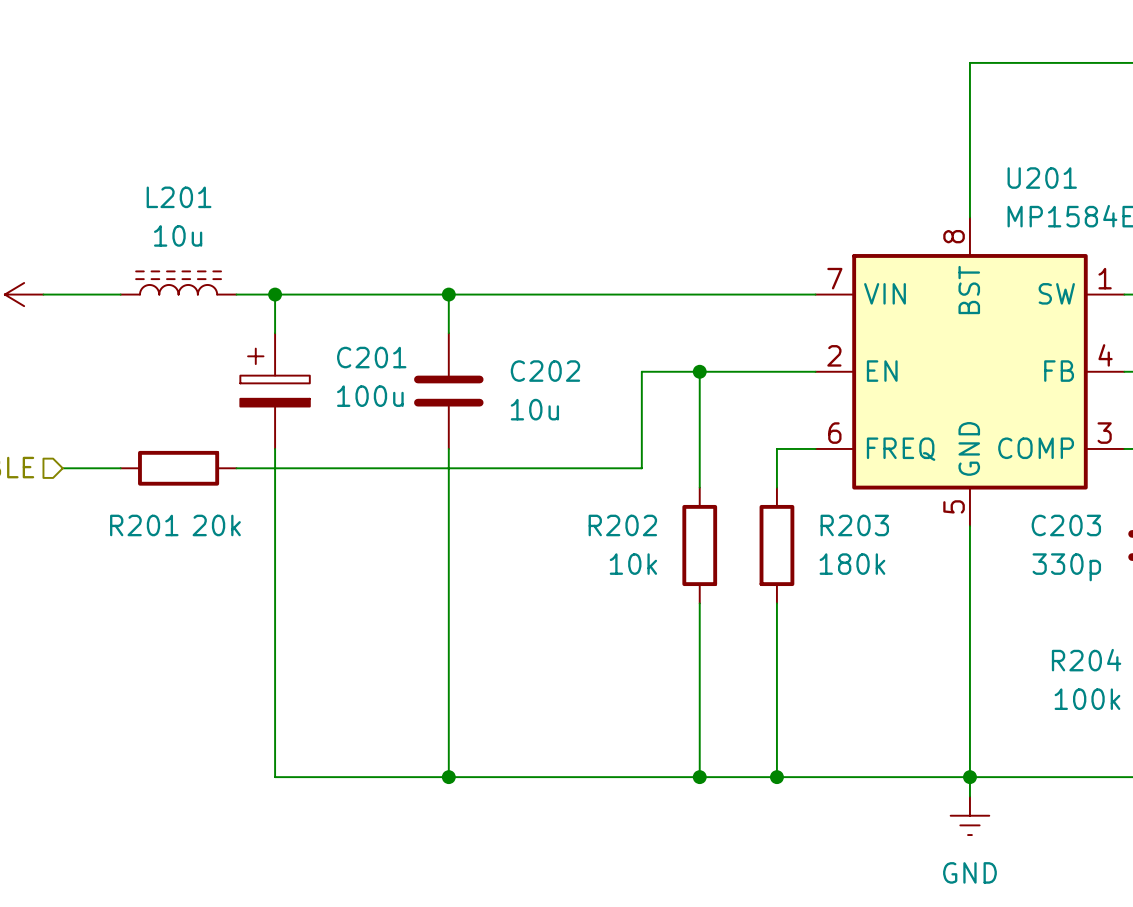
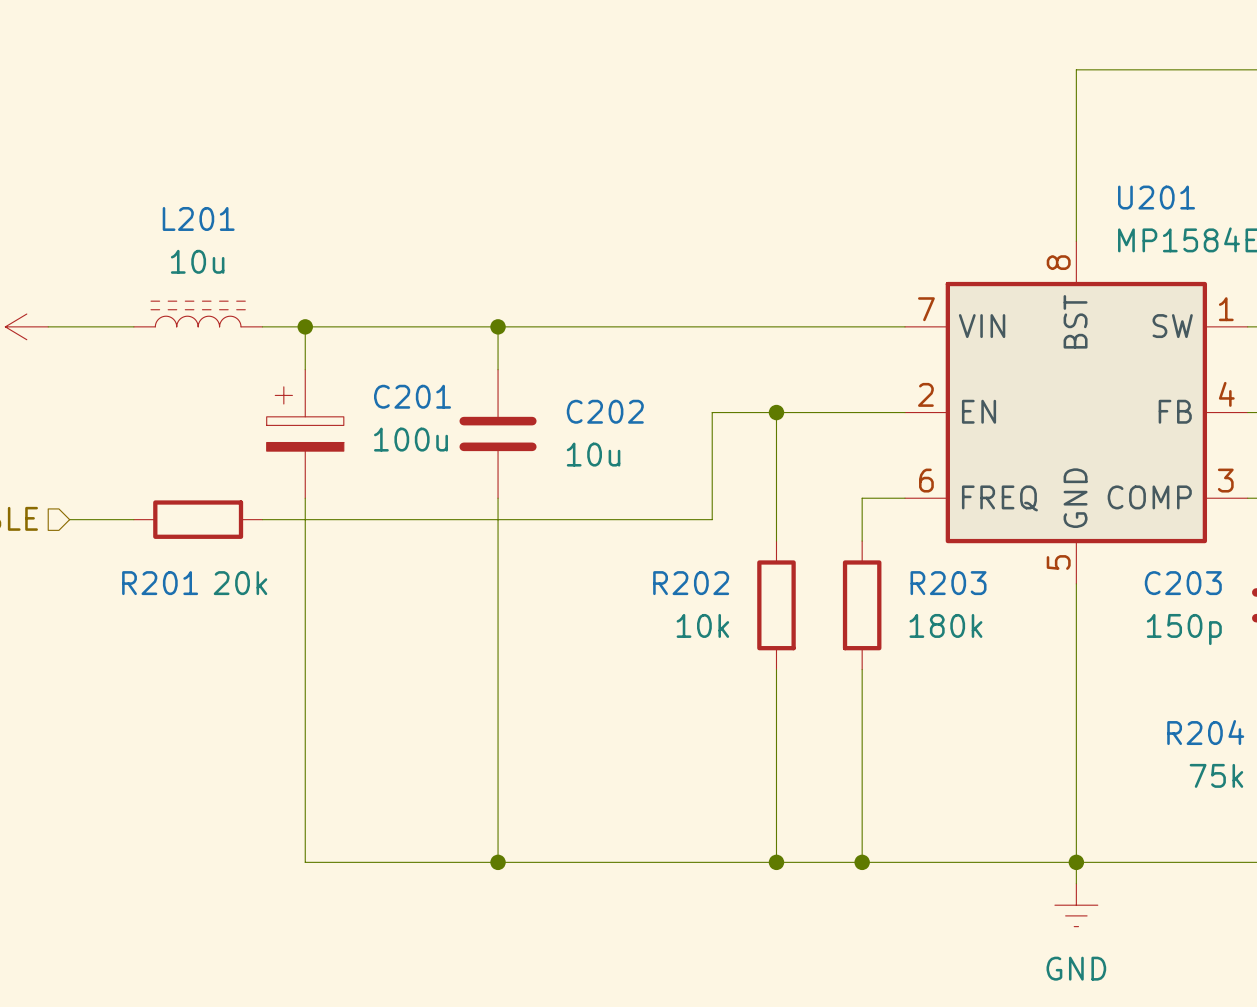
C203 value: 330p (1066, 567) -> 150p (1184, 629)
R204 value: 100k (1087, 699) -> 75k (1216, 775)

